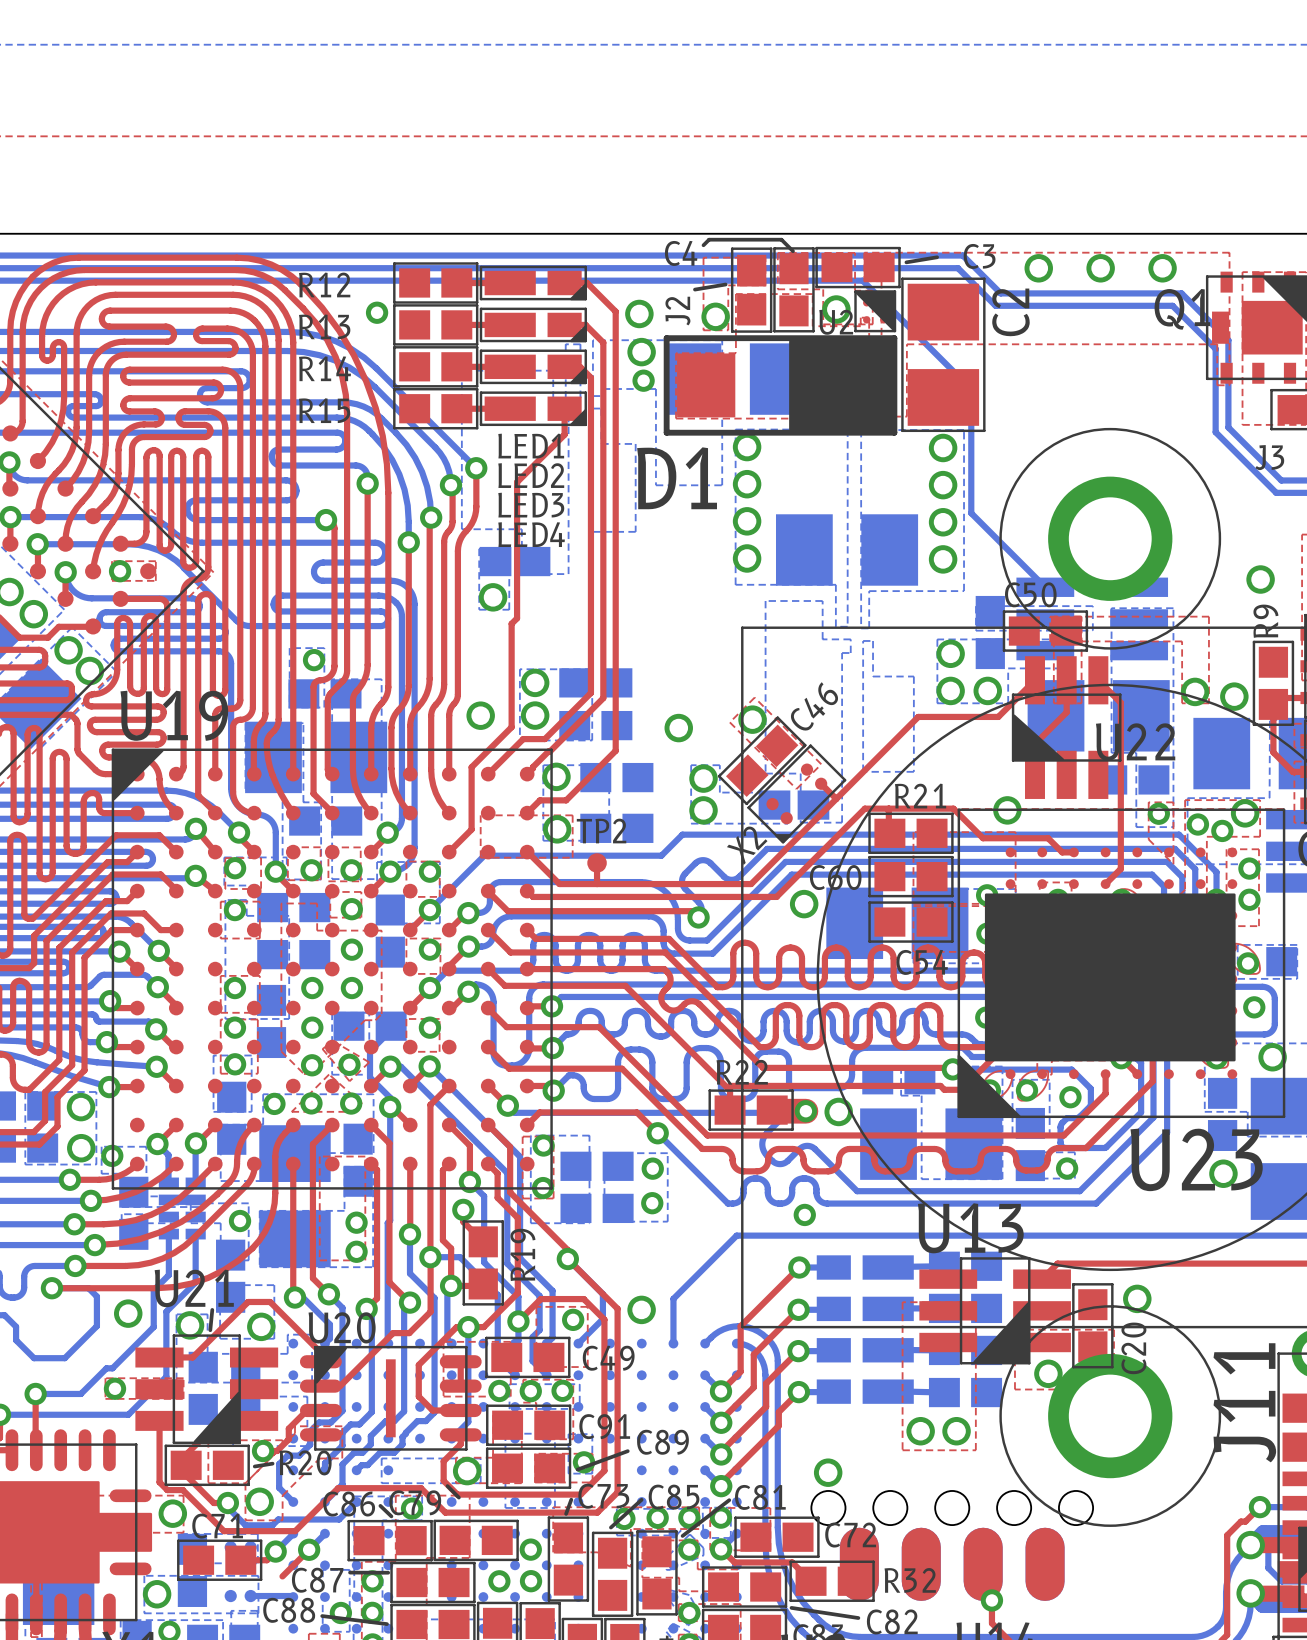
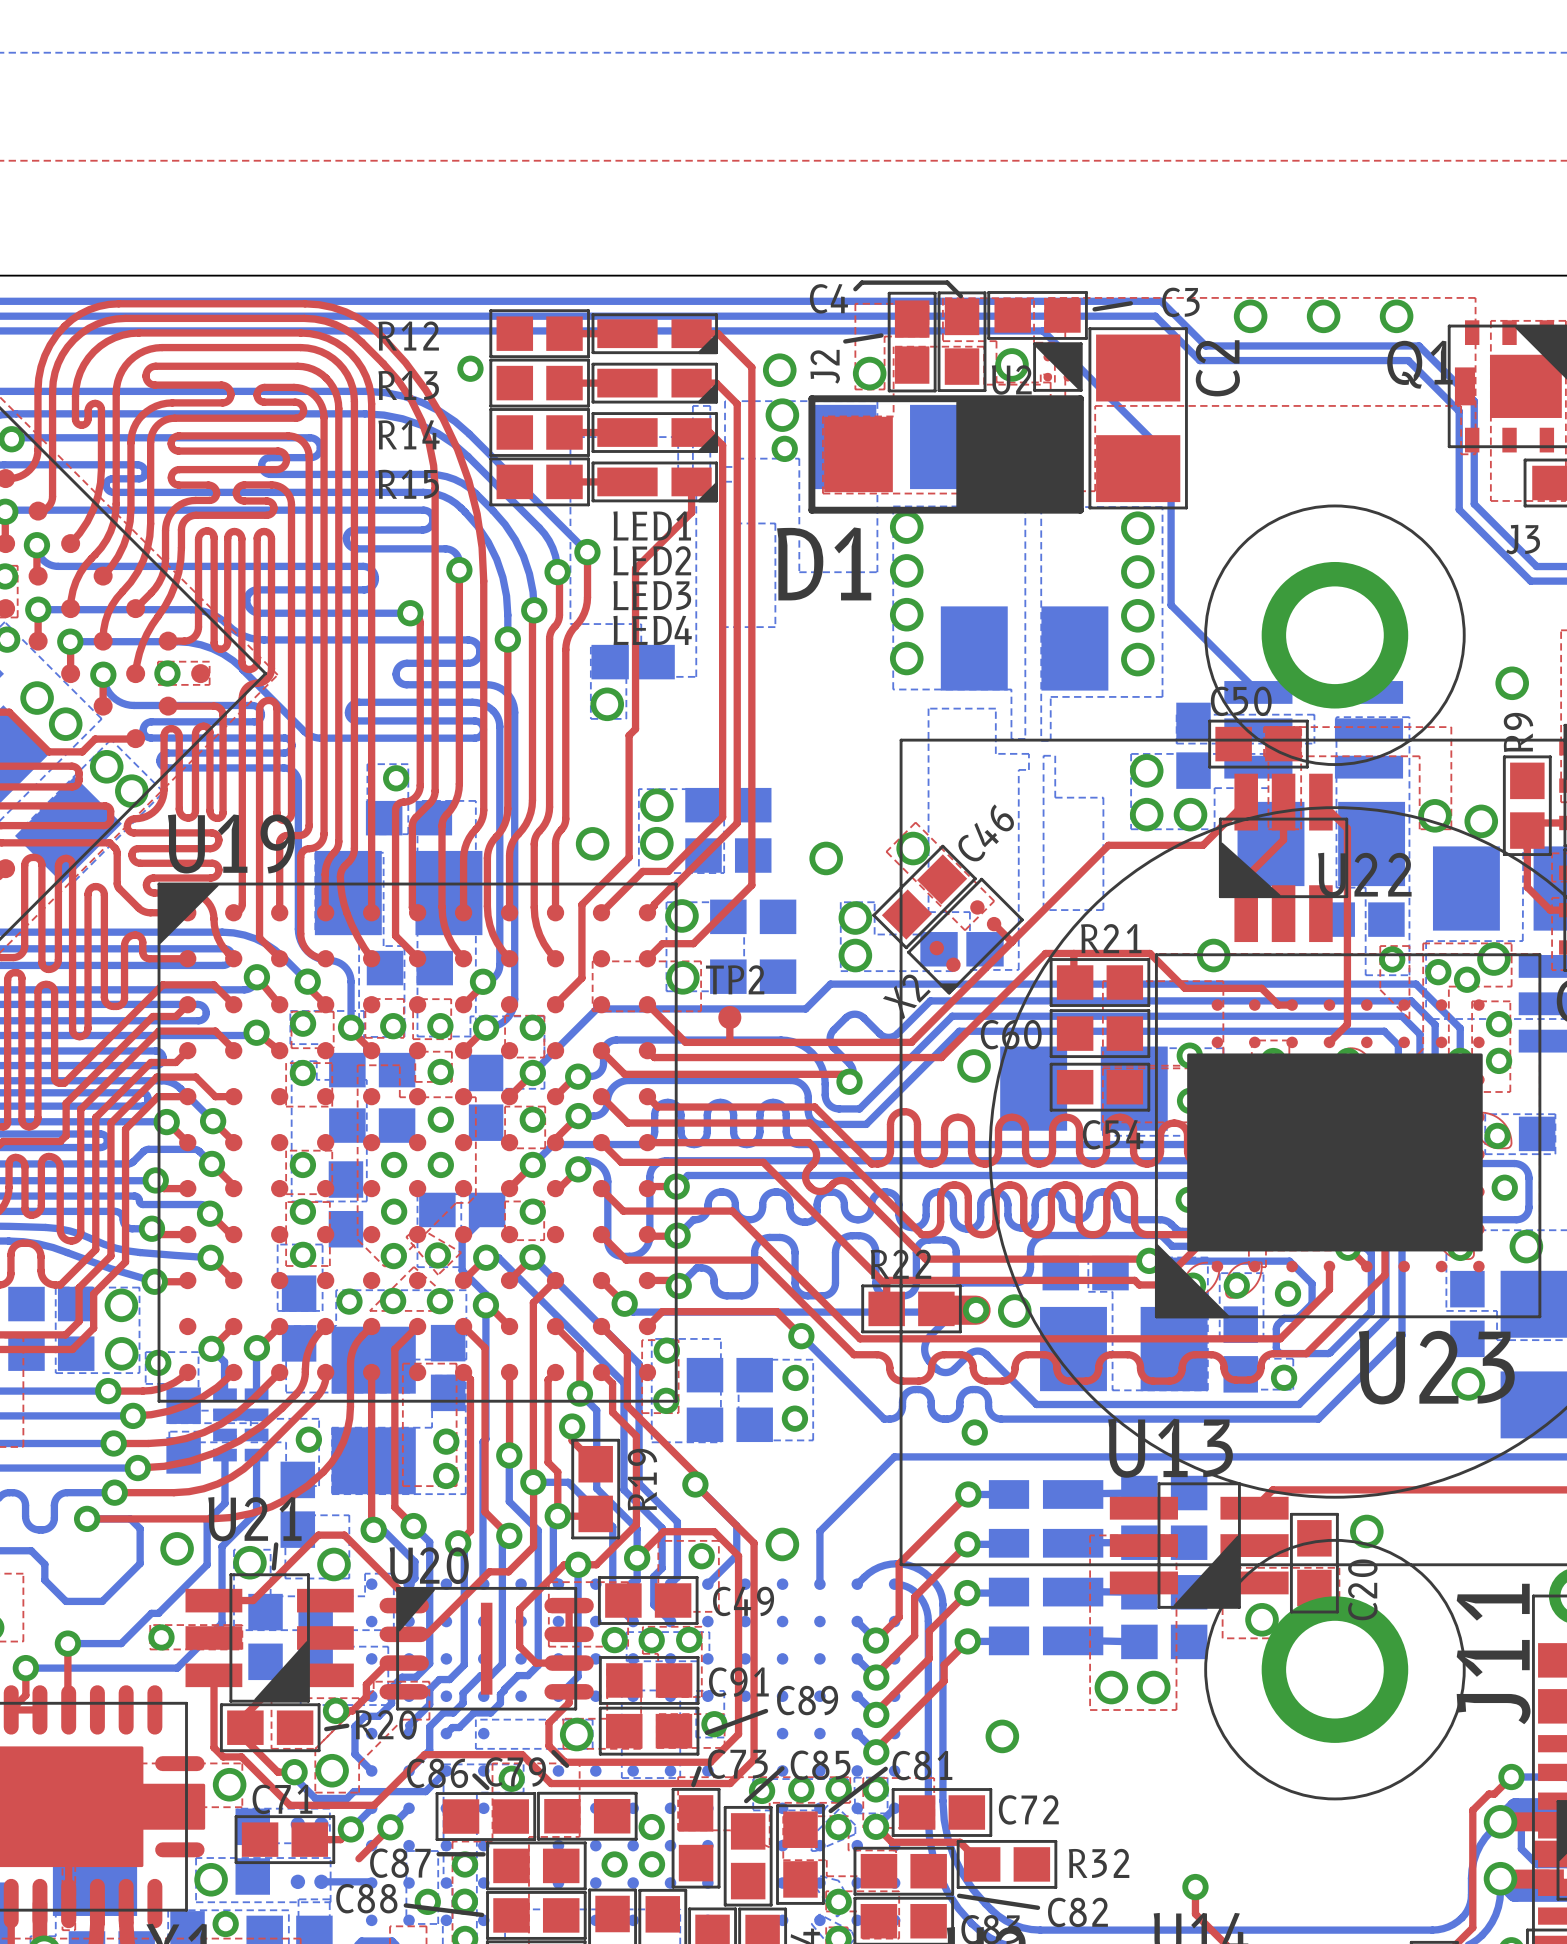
part: (952, 1545) -> none

